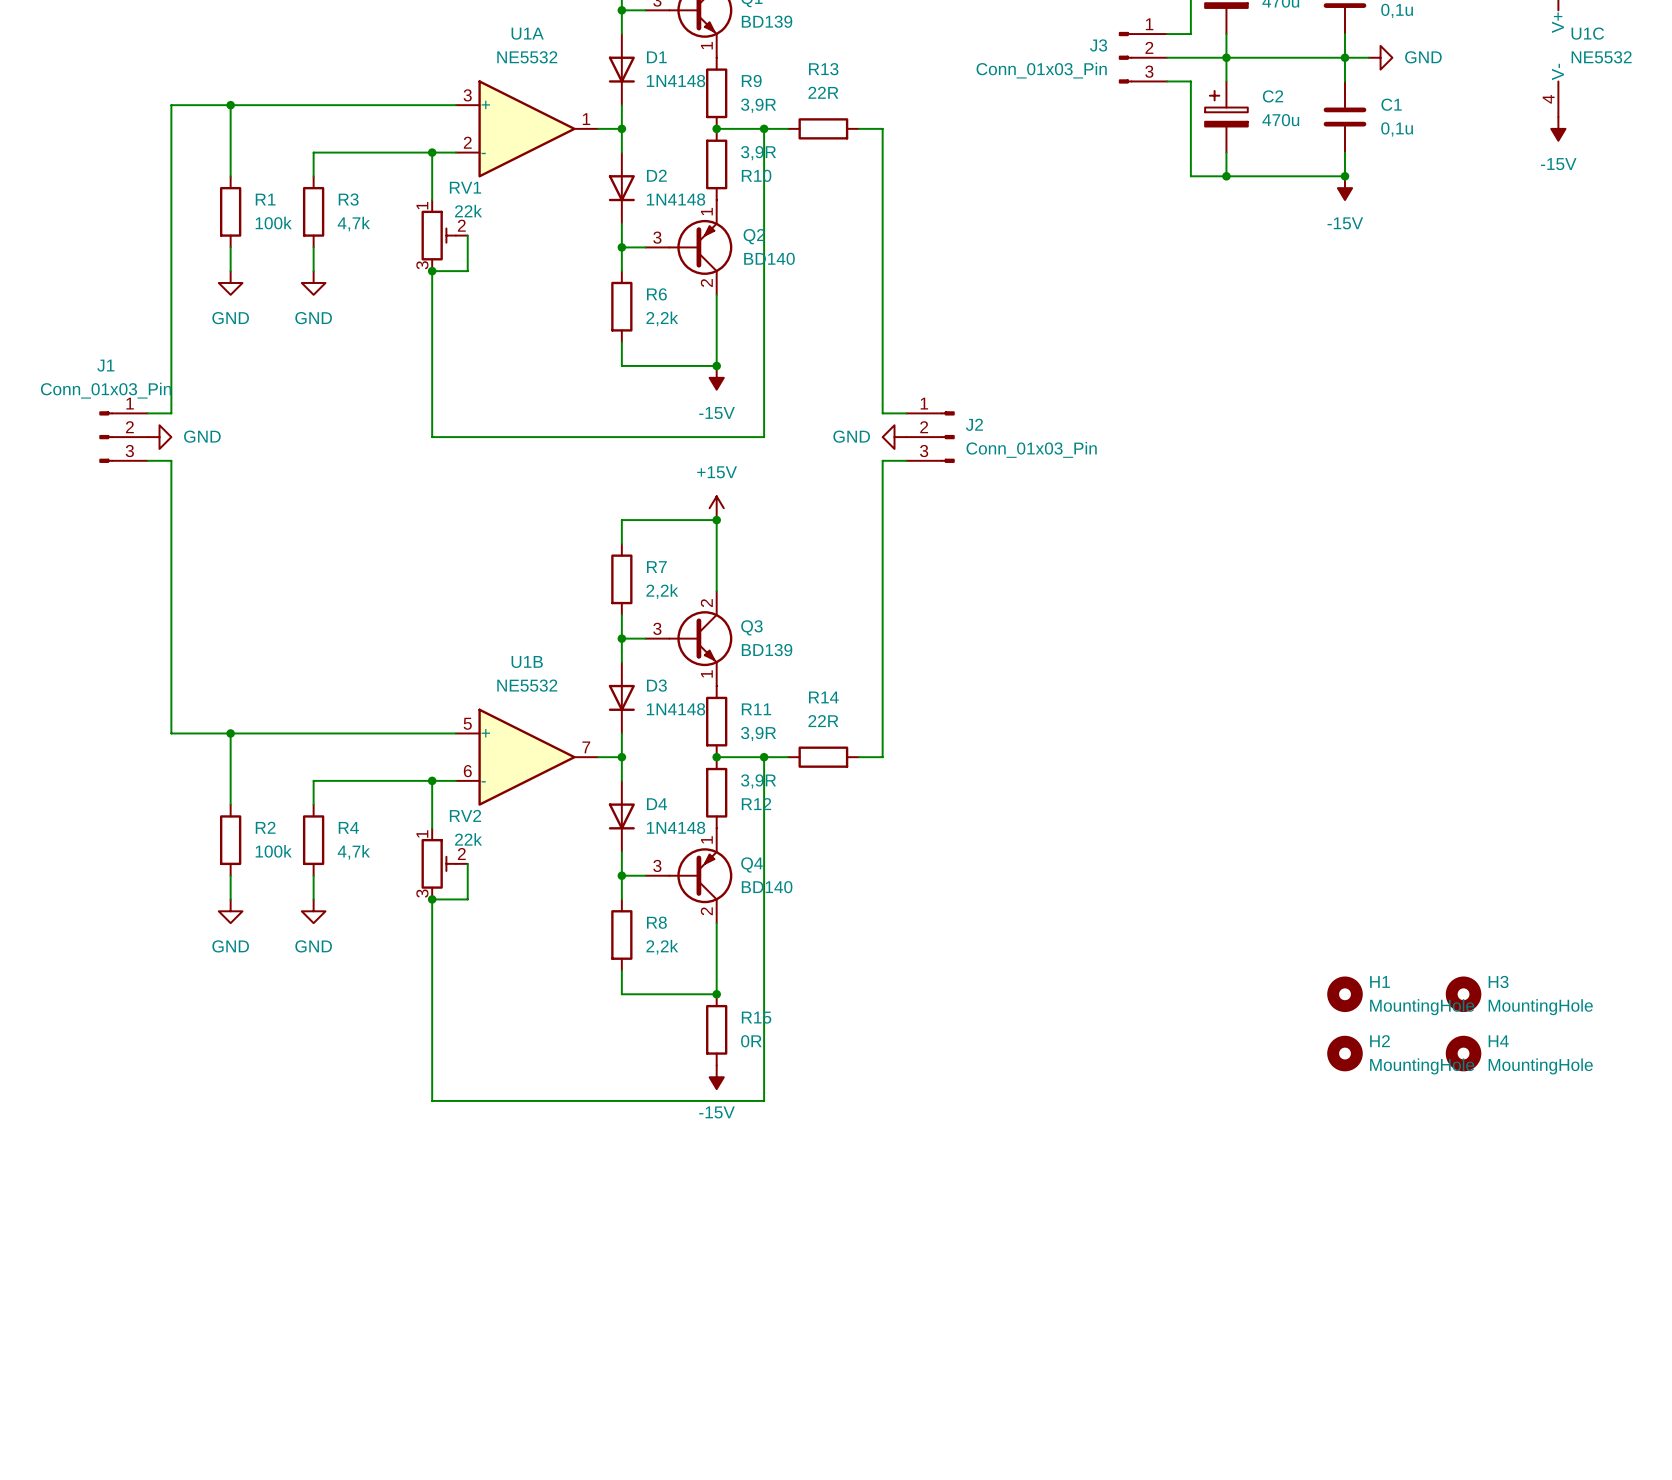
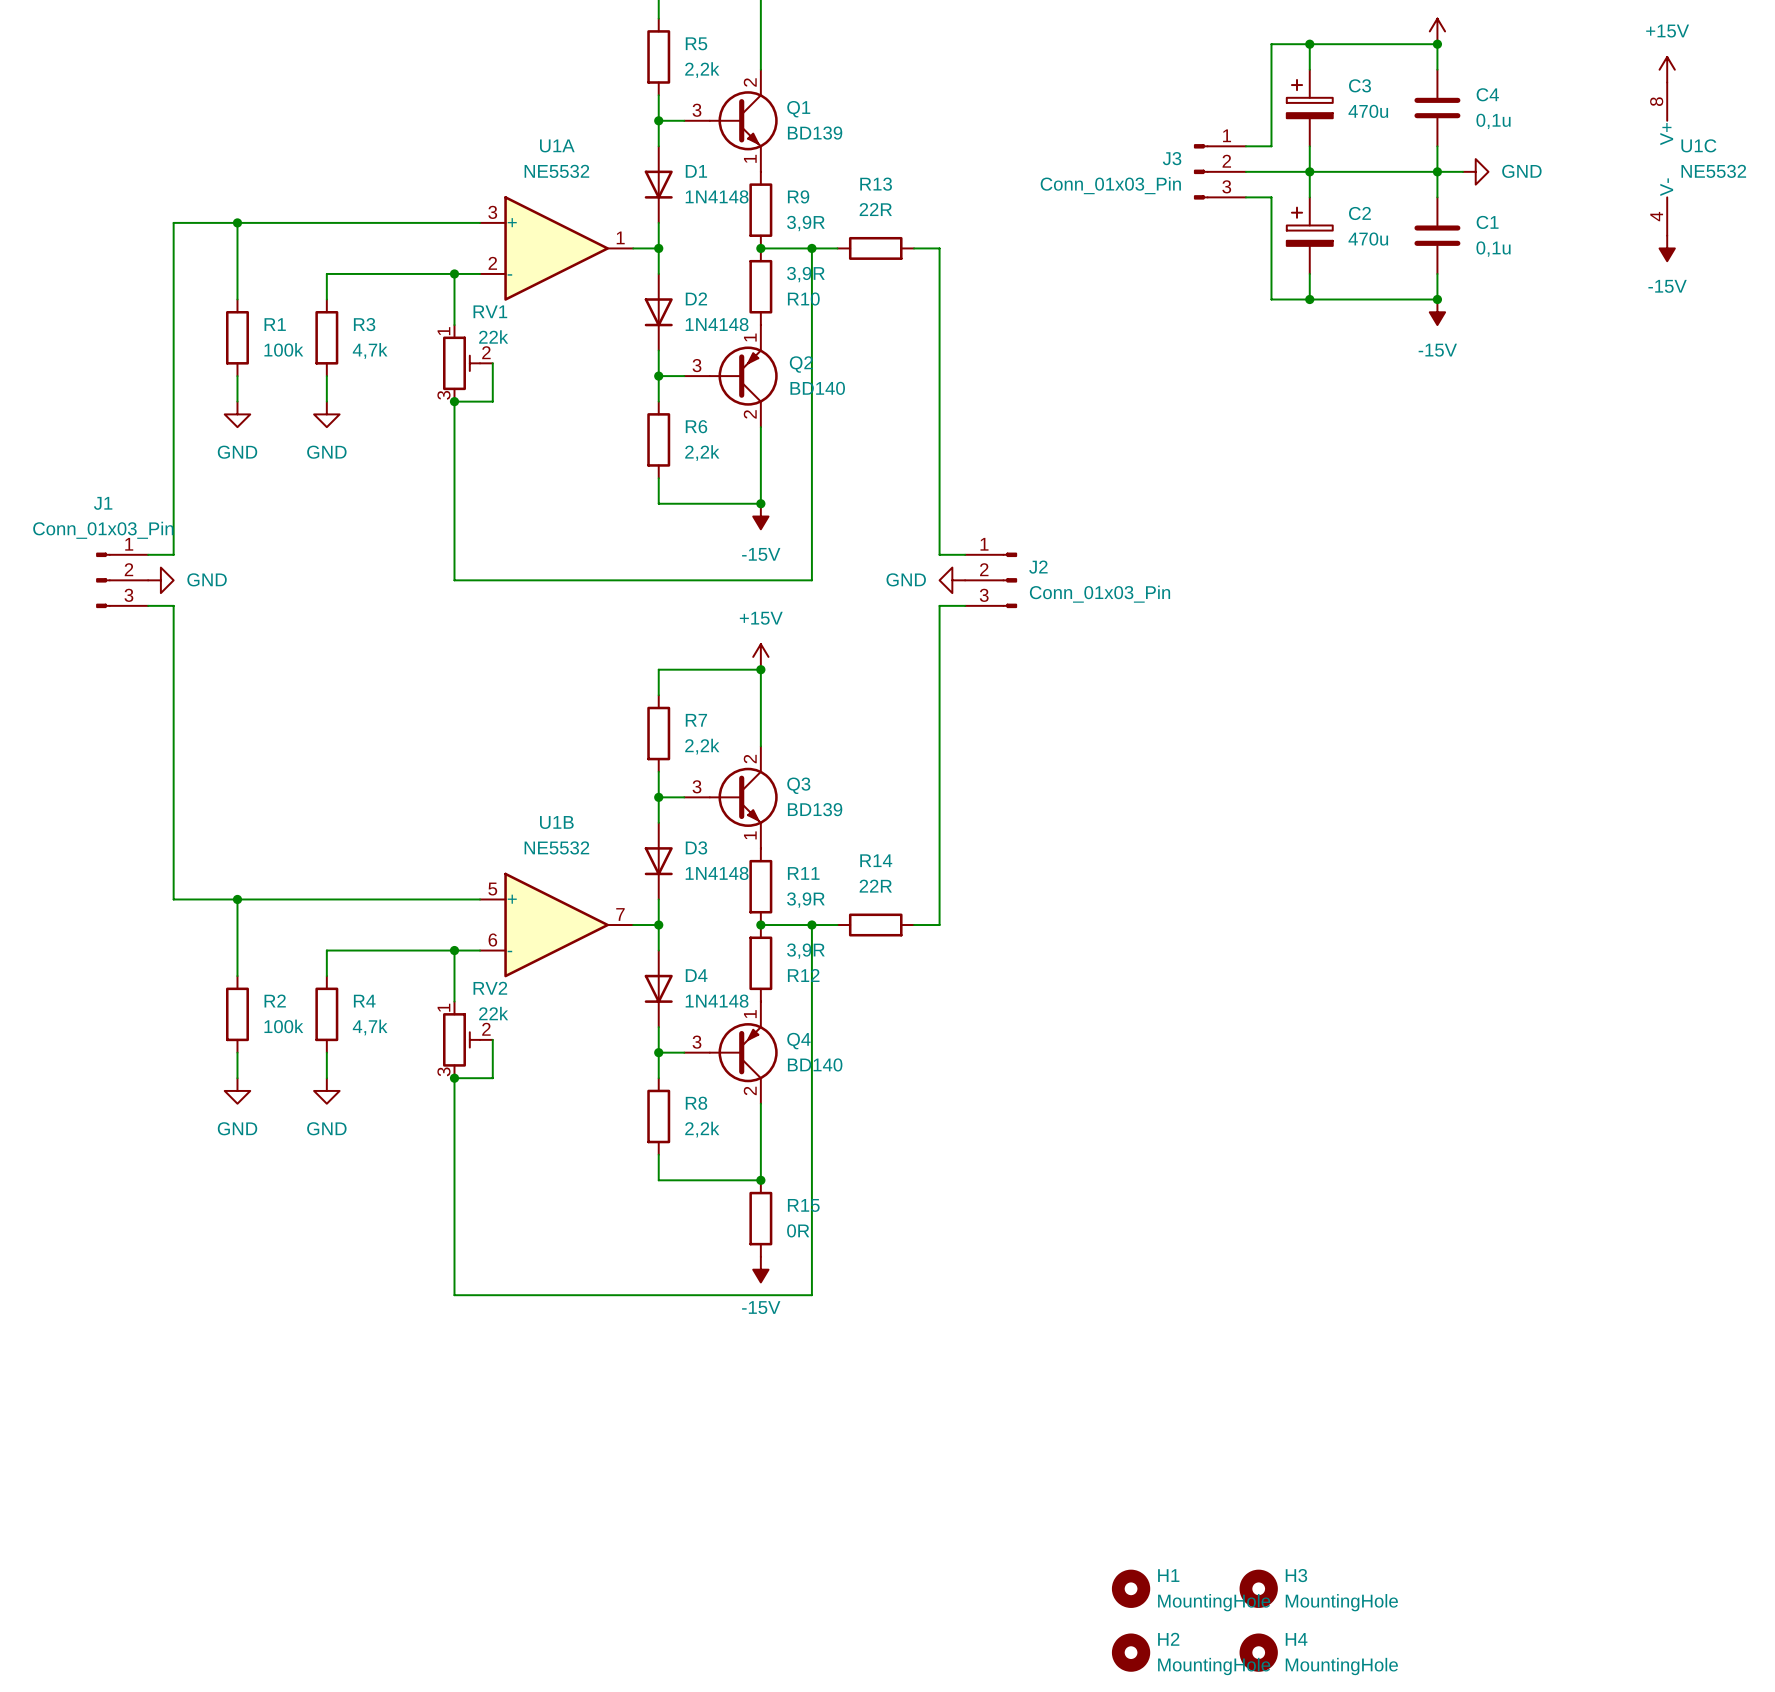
H1 position: (1344, 994) -> (1131, 1588)
H3 position: (1463, 994) -> (1258, 1588)
H2 position: (1344, 1053) -> (1131, 1652)
H4 position: (1463, 1053) -> (1258, 1652)

